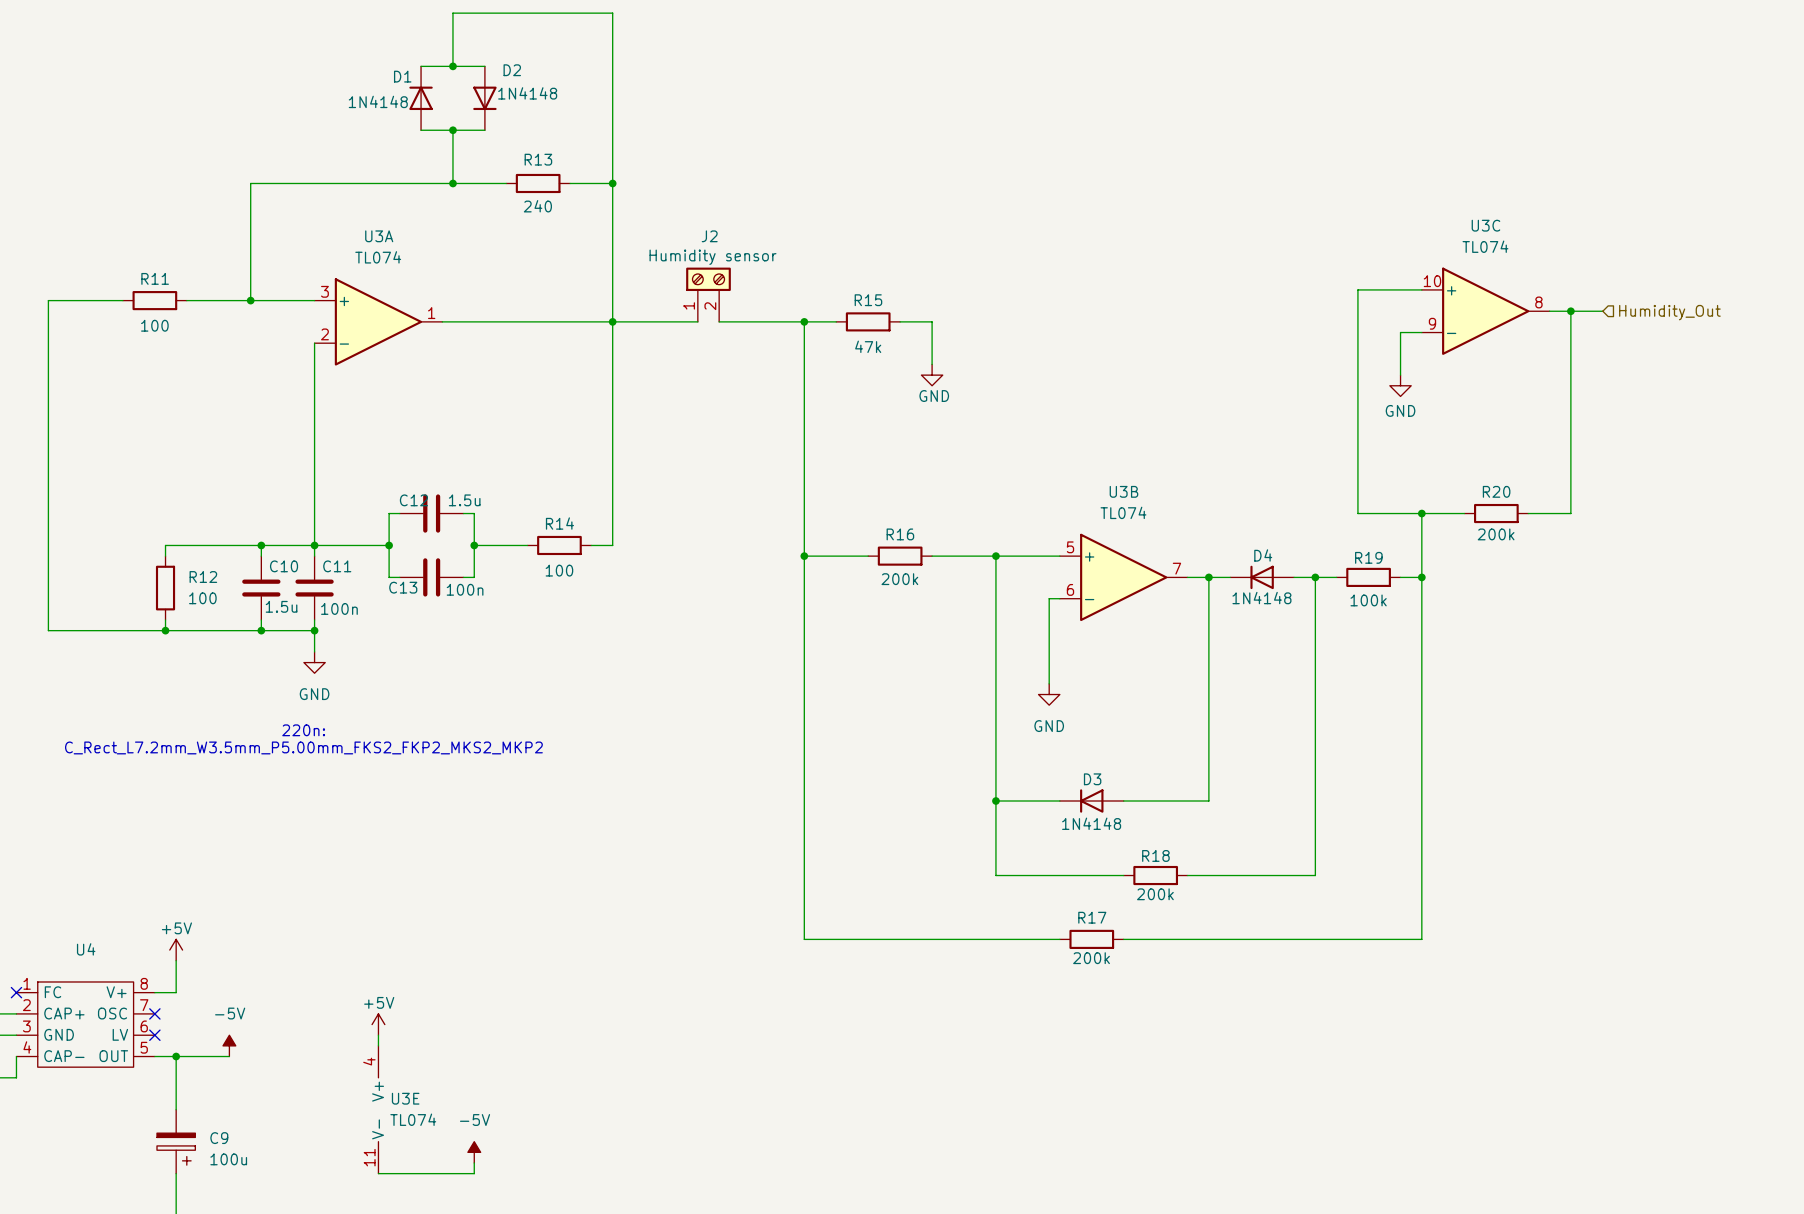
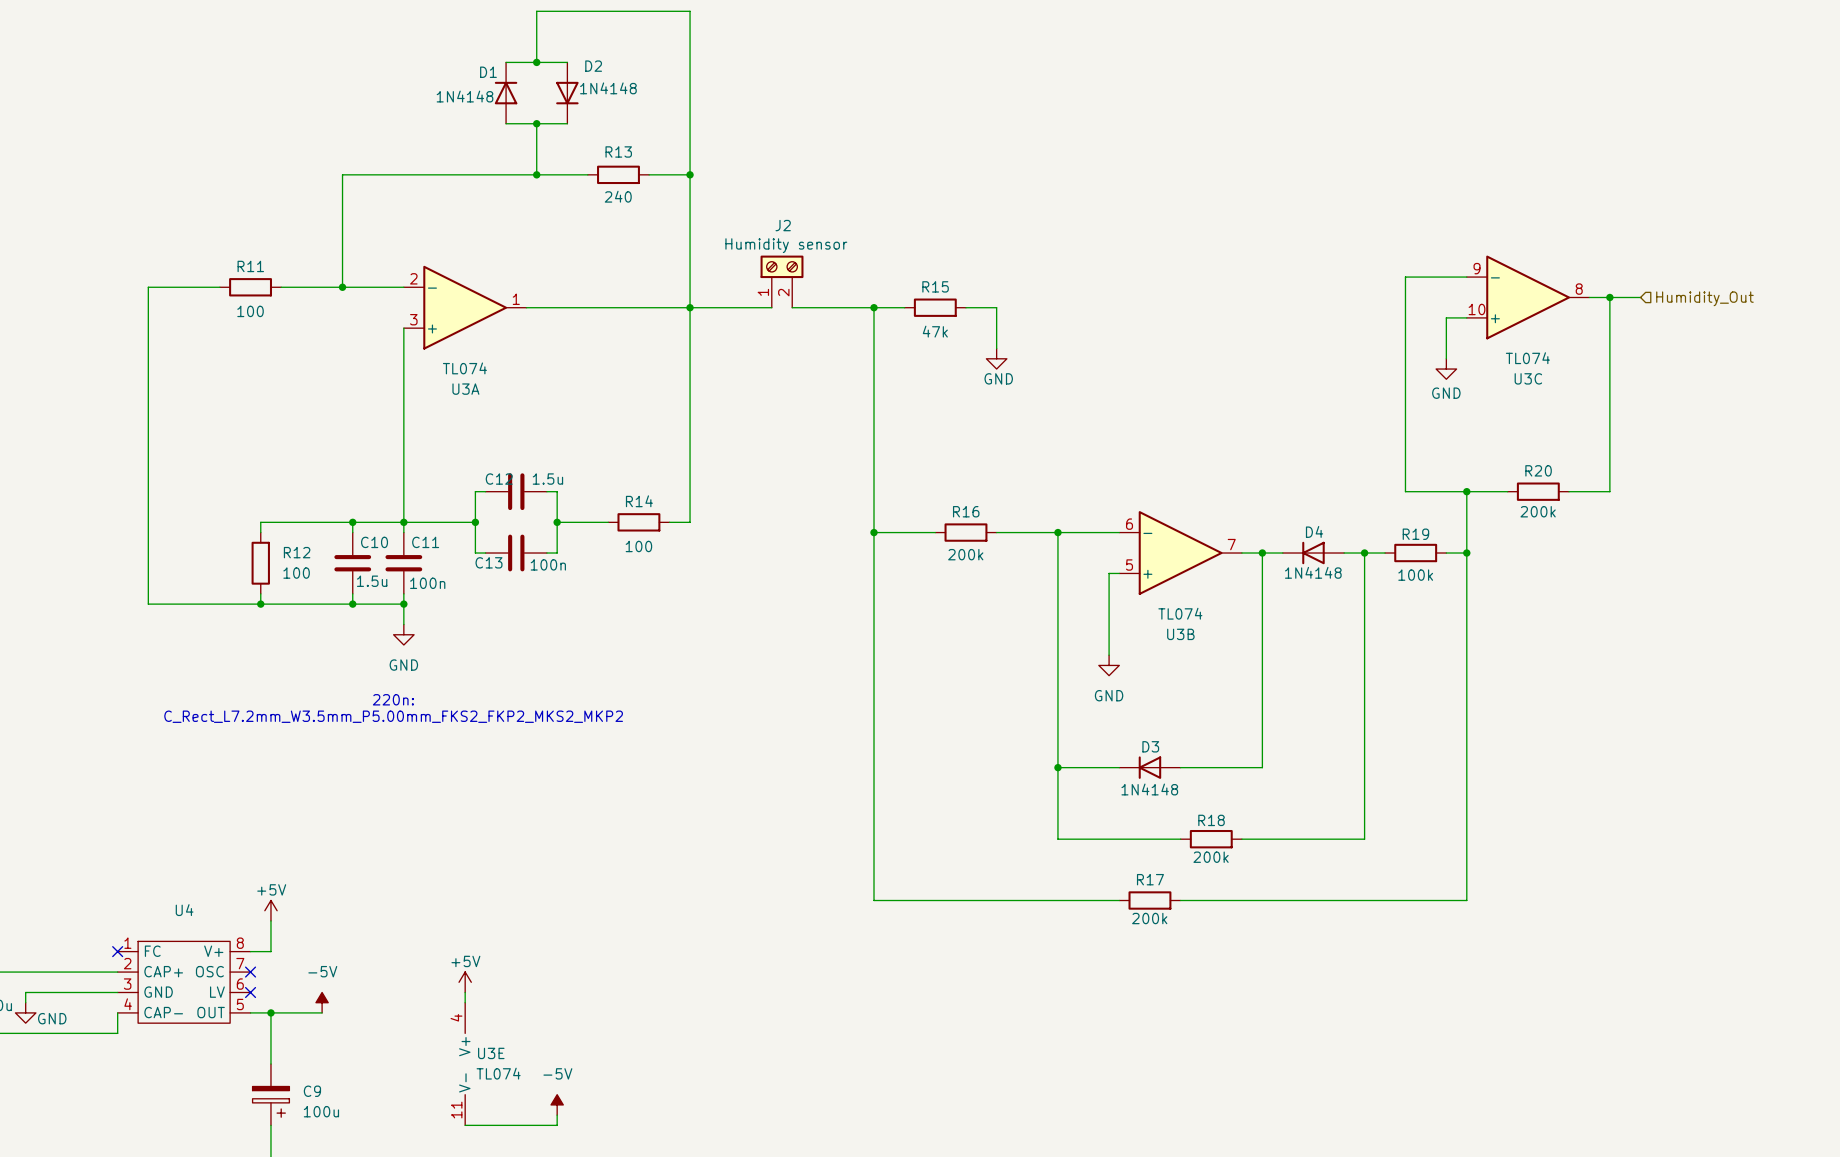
U3C flip: as is (1485, 311) -> up-down (1528, 297)
U3A flip: as is (378, 321) -> up-down (465, 307)
U3B flip: as is (1123, 577) -> up-down (1180, 553)

